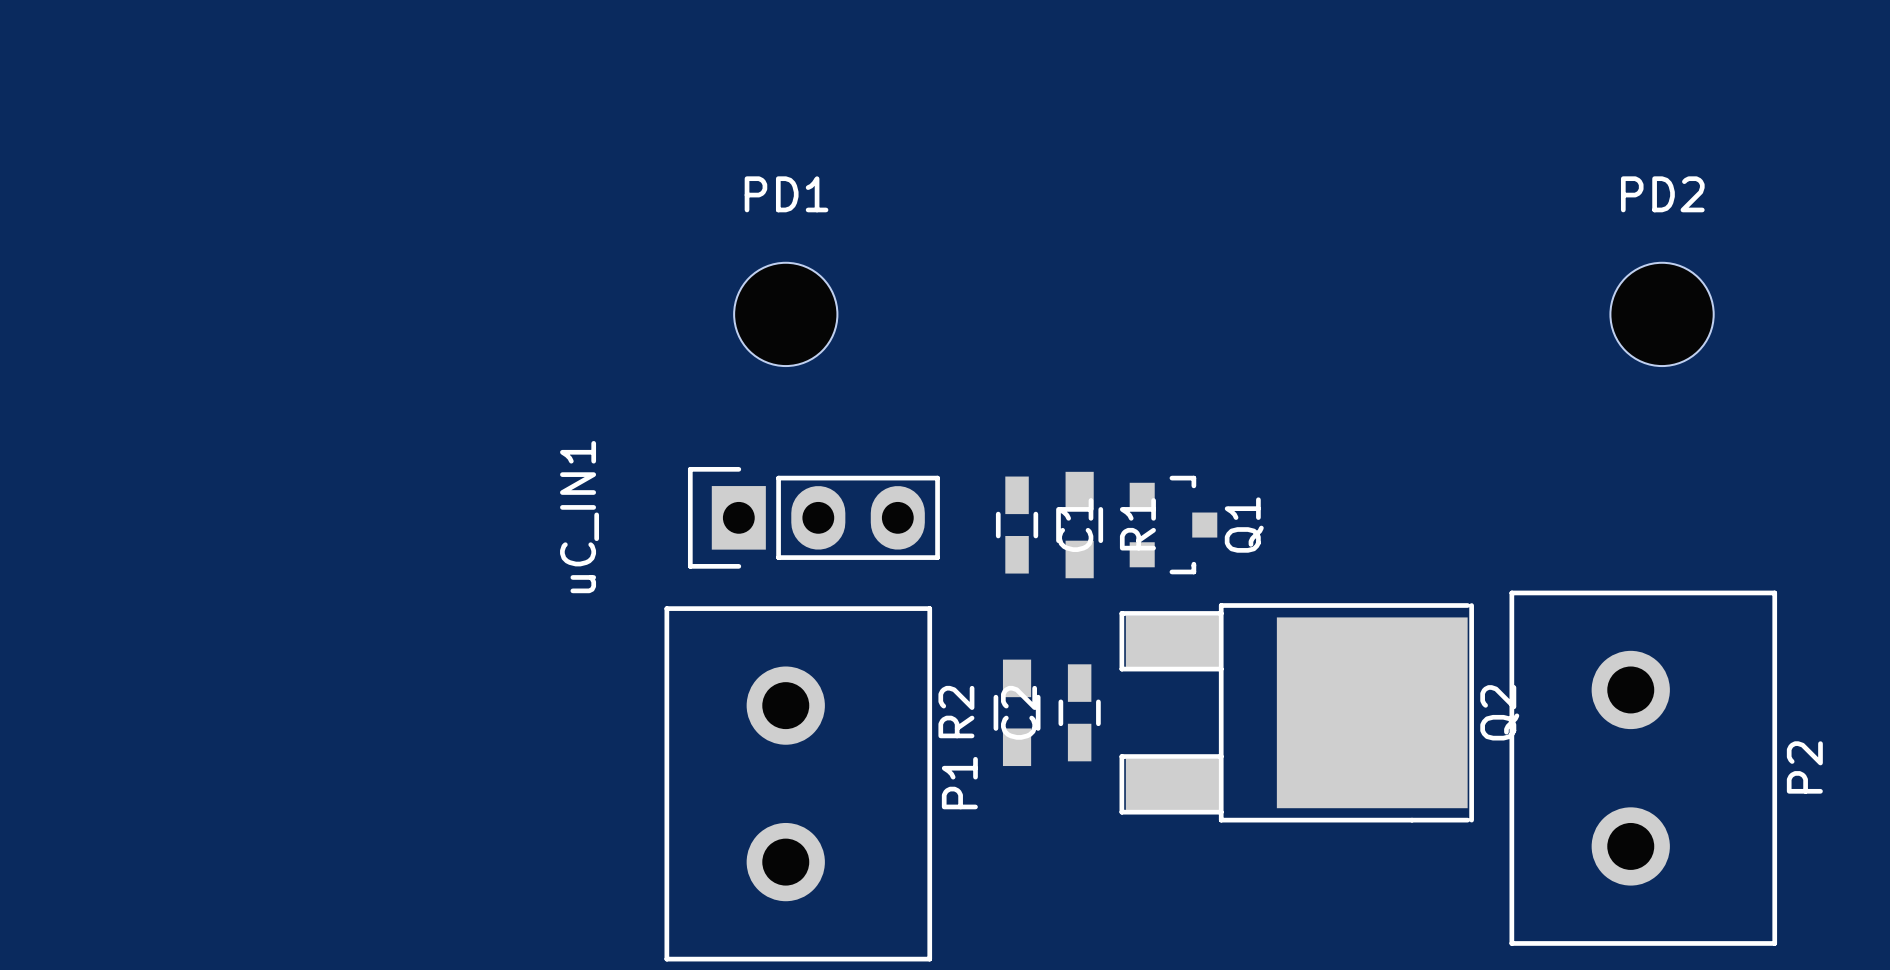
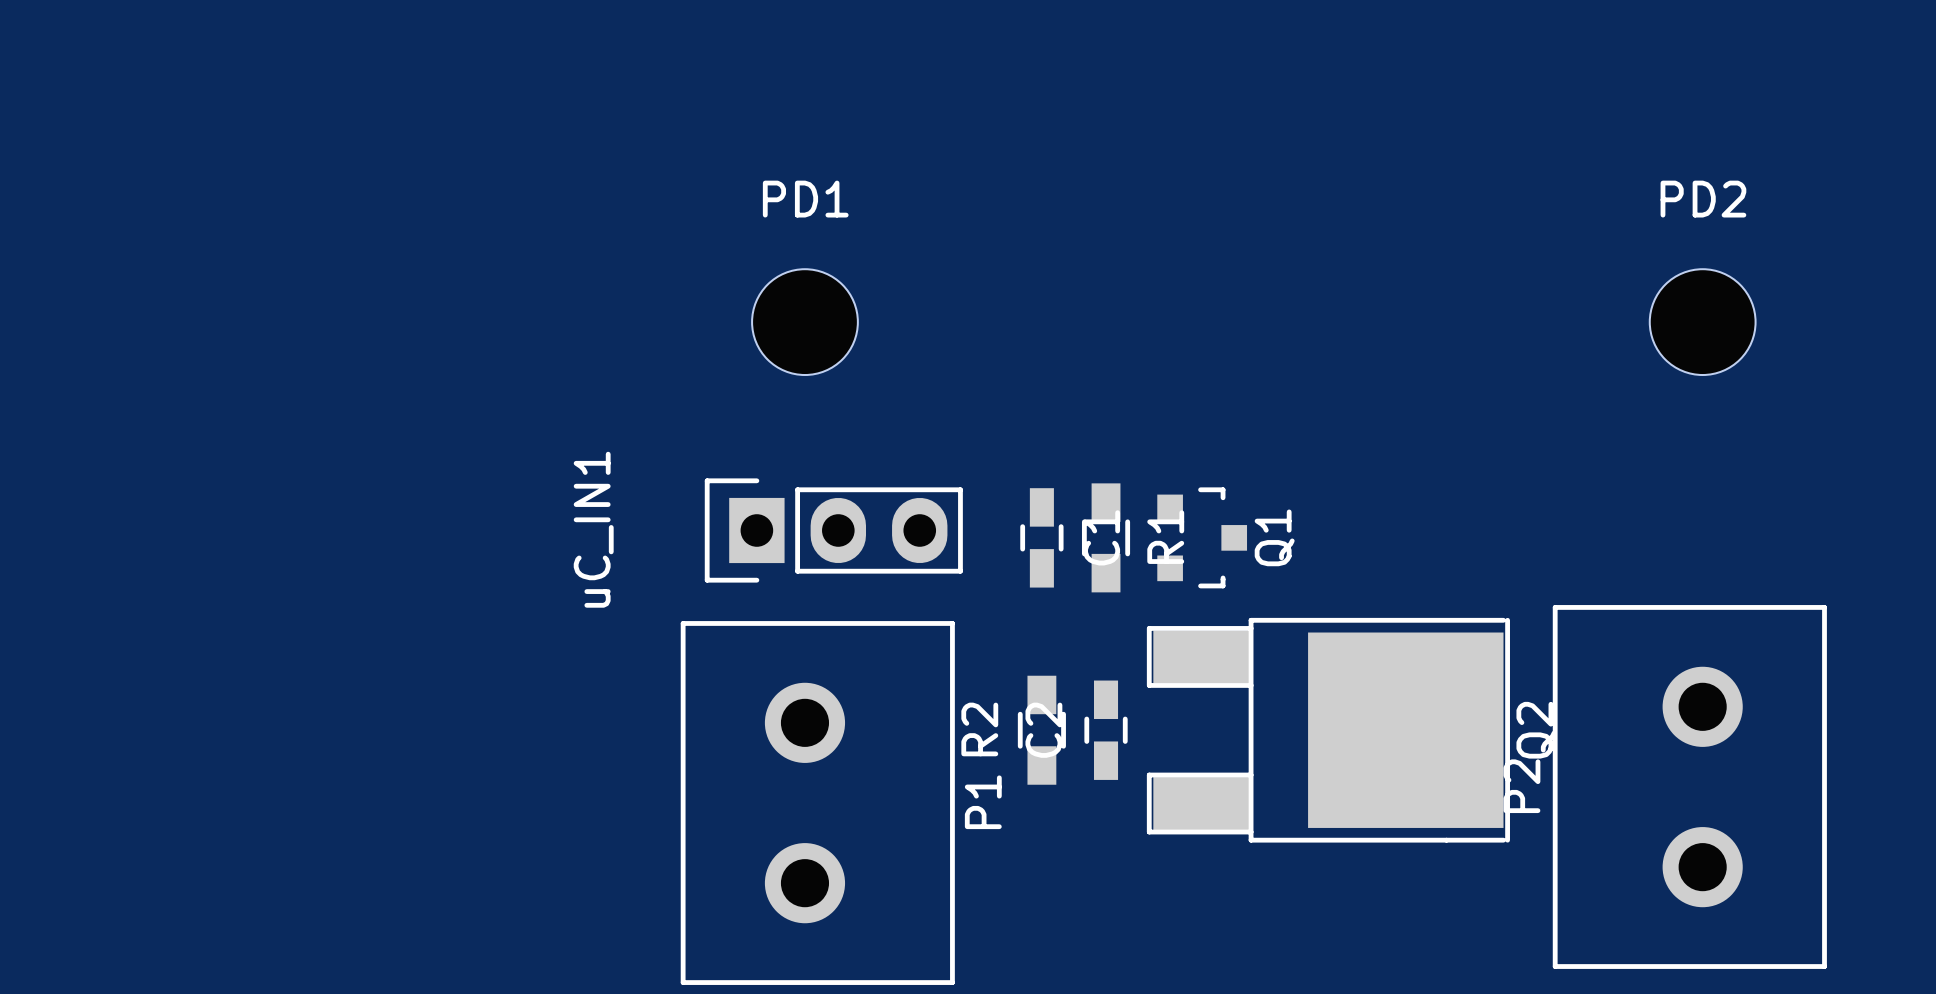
P2 rotation: 0° (1643, 768) -> 180° (1689, 786)

